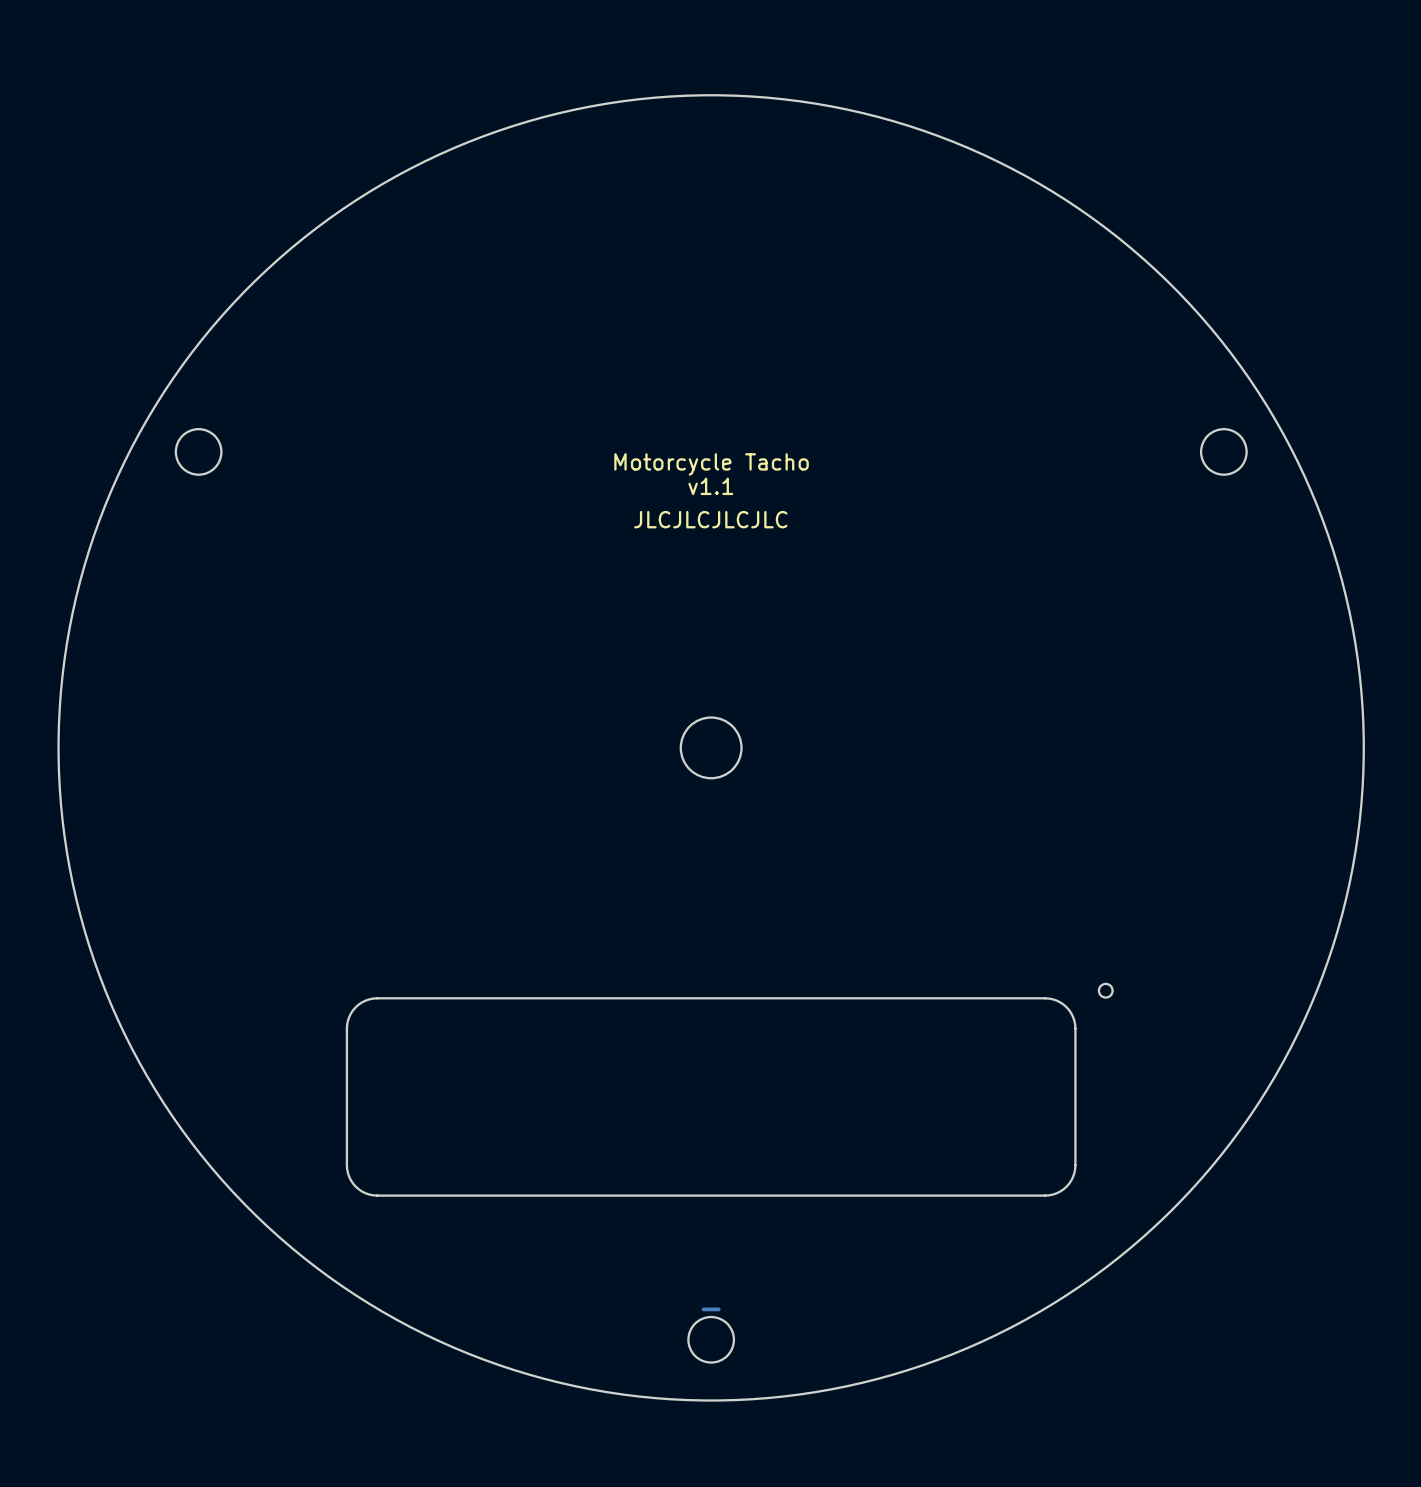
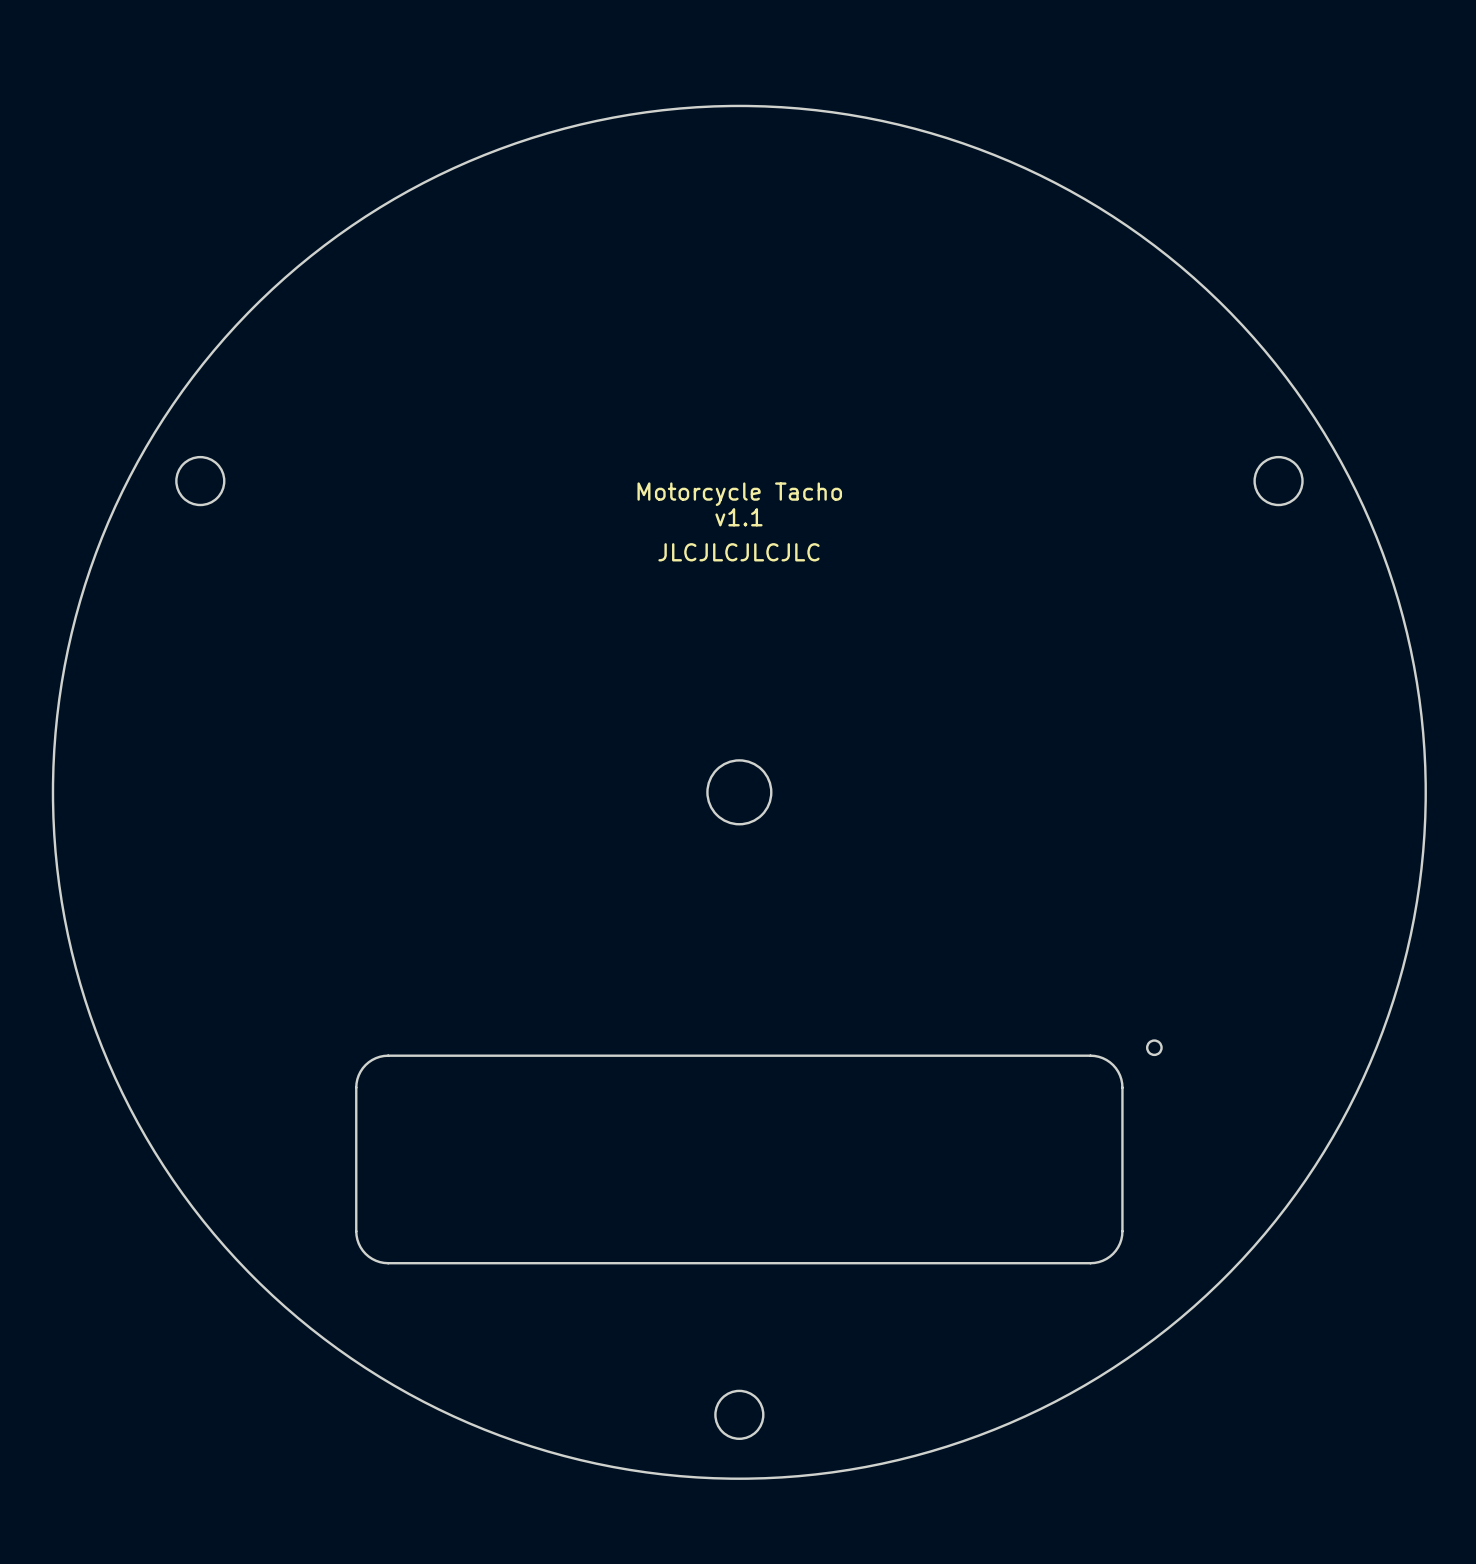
track: (718, 1309) (703, 1309) -> none

